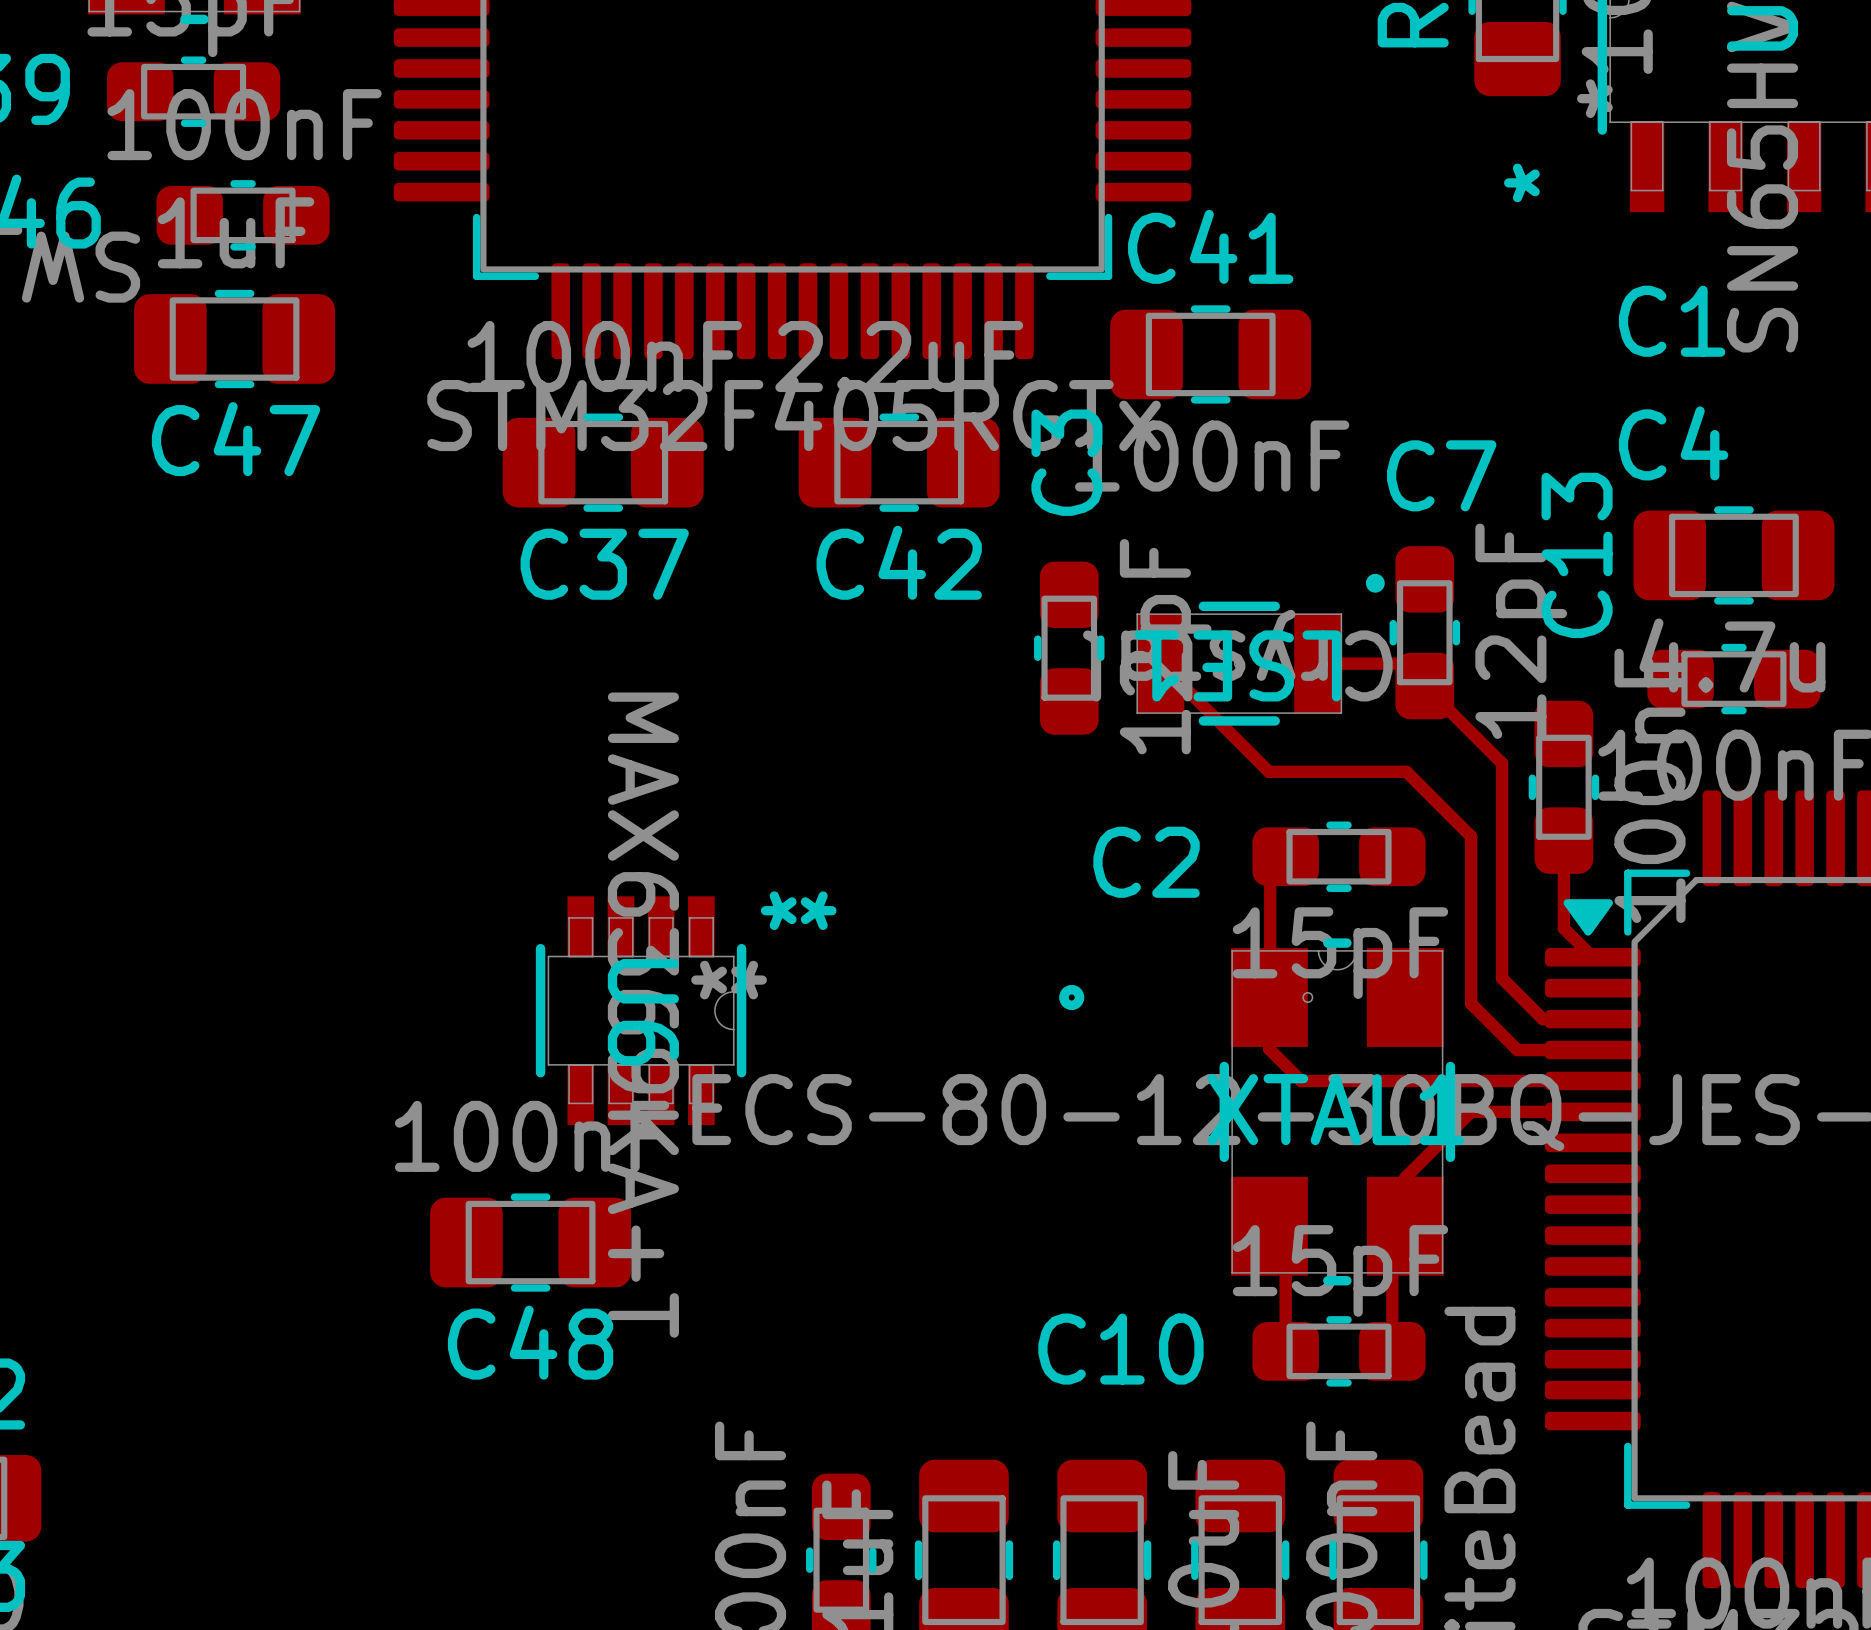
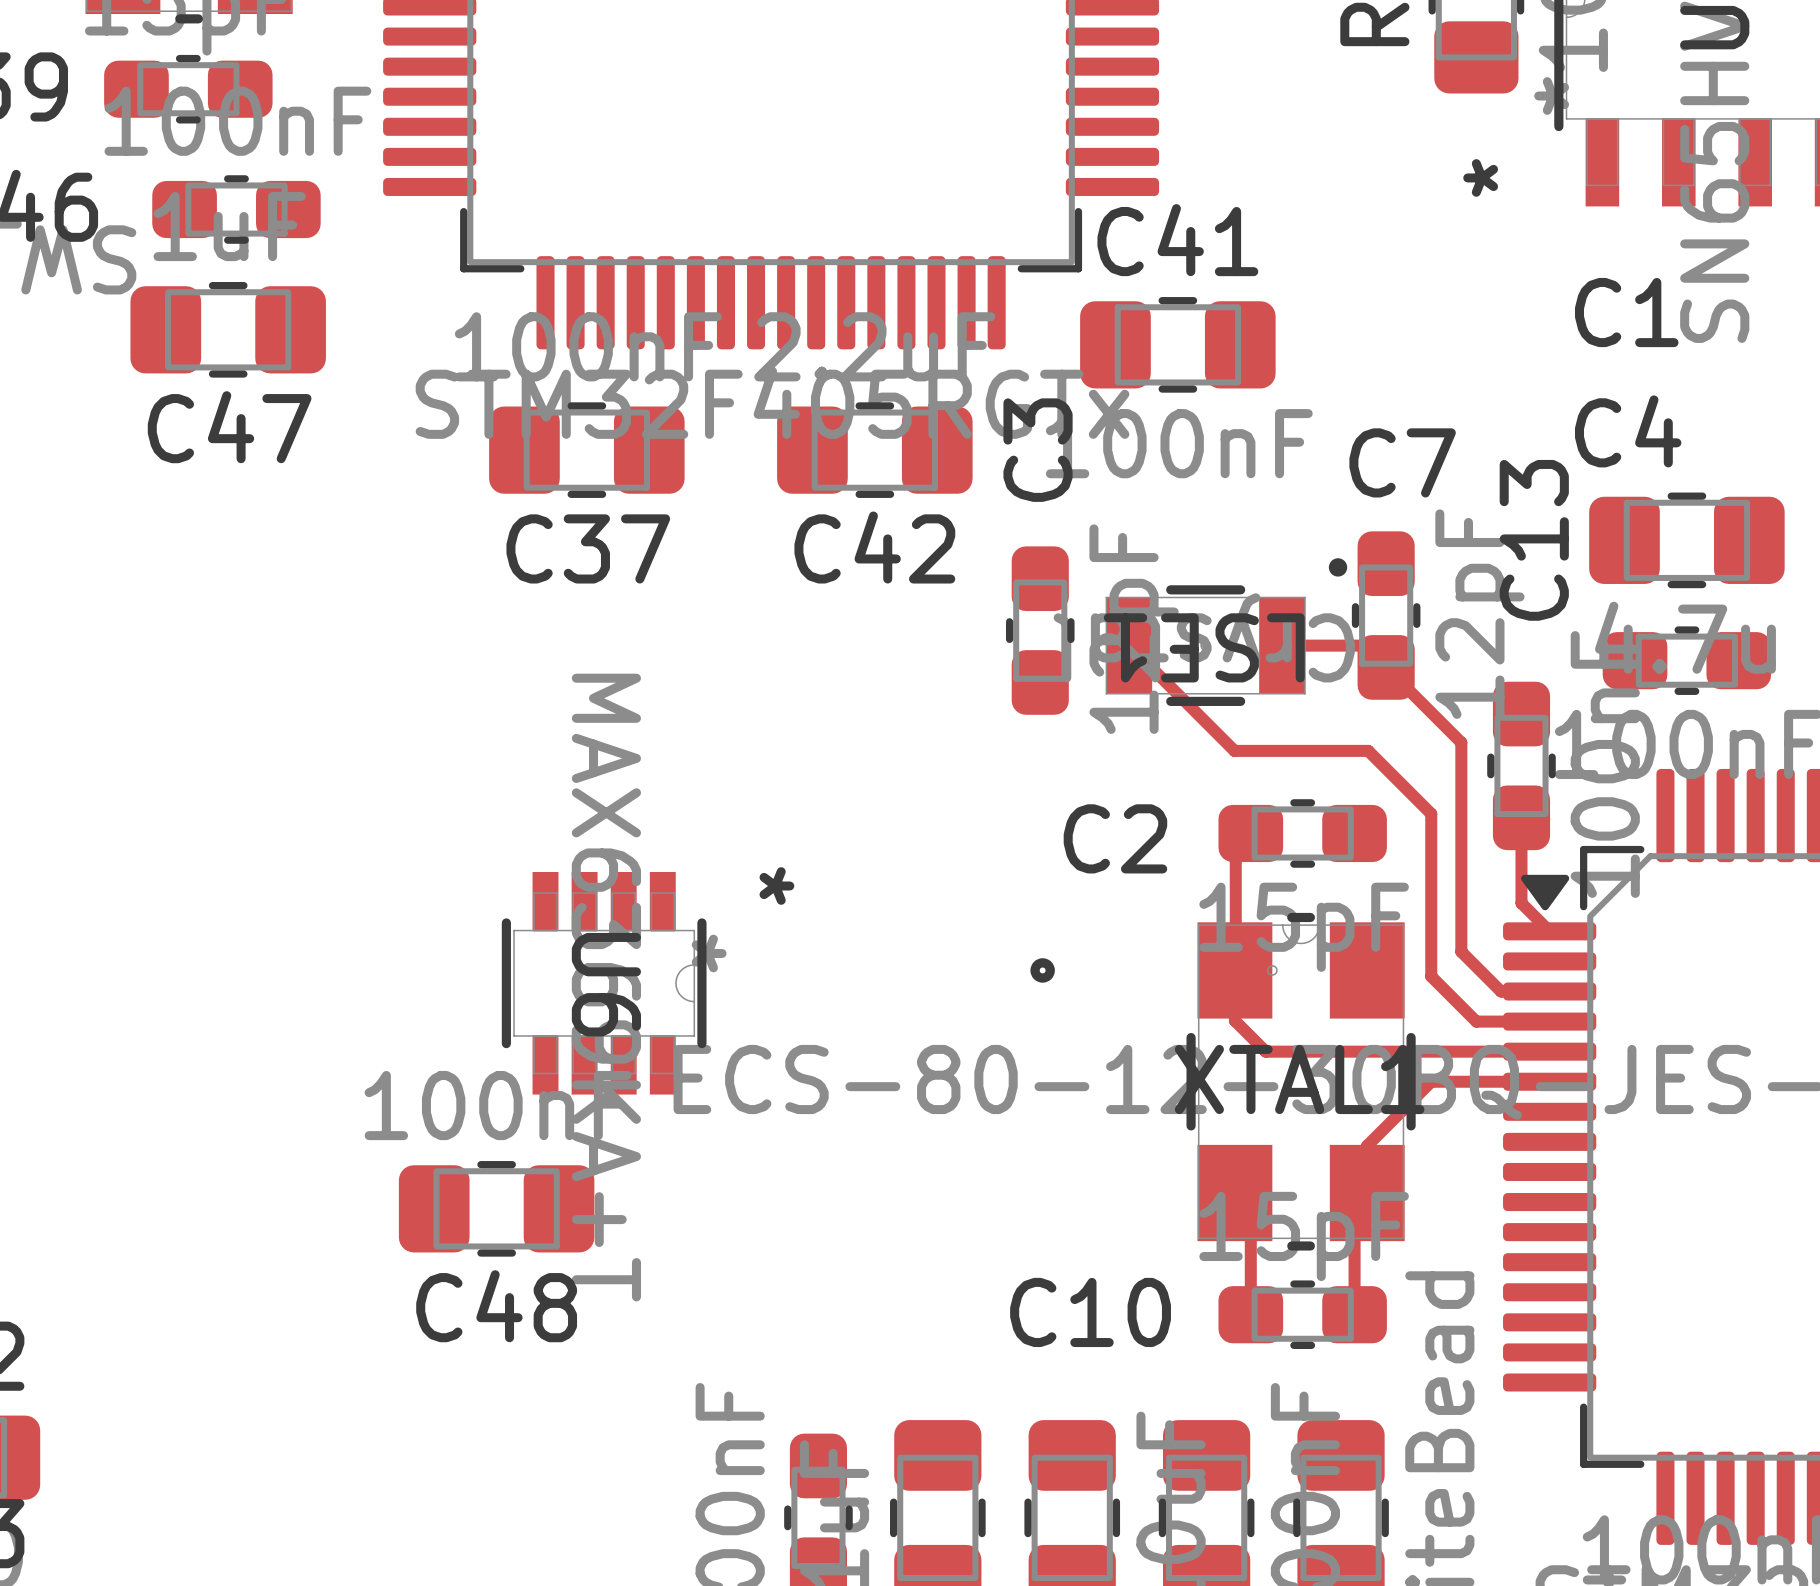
U6 position: (641, 1010) -> (604, 983)
C48 position: (530, 1242) -> (496, 1208)

